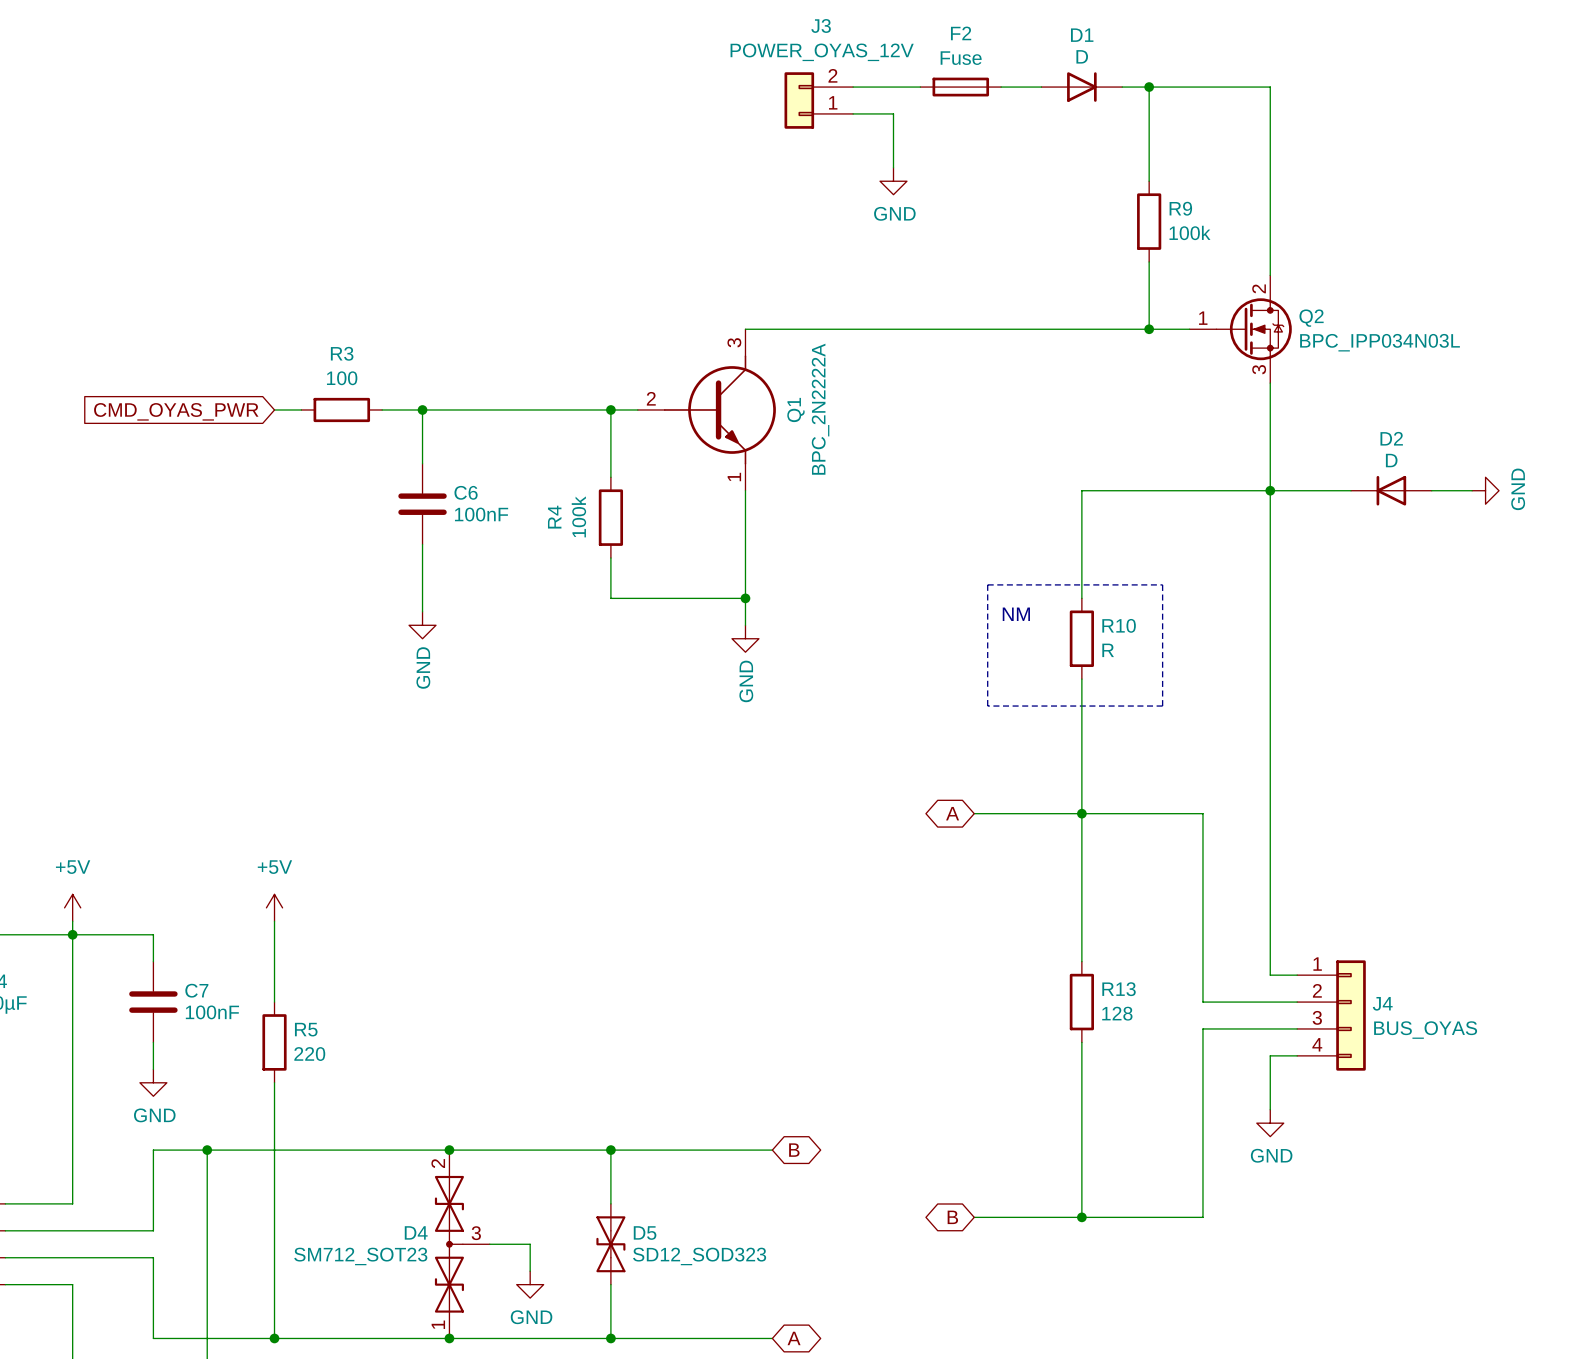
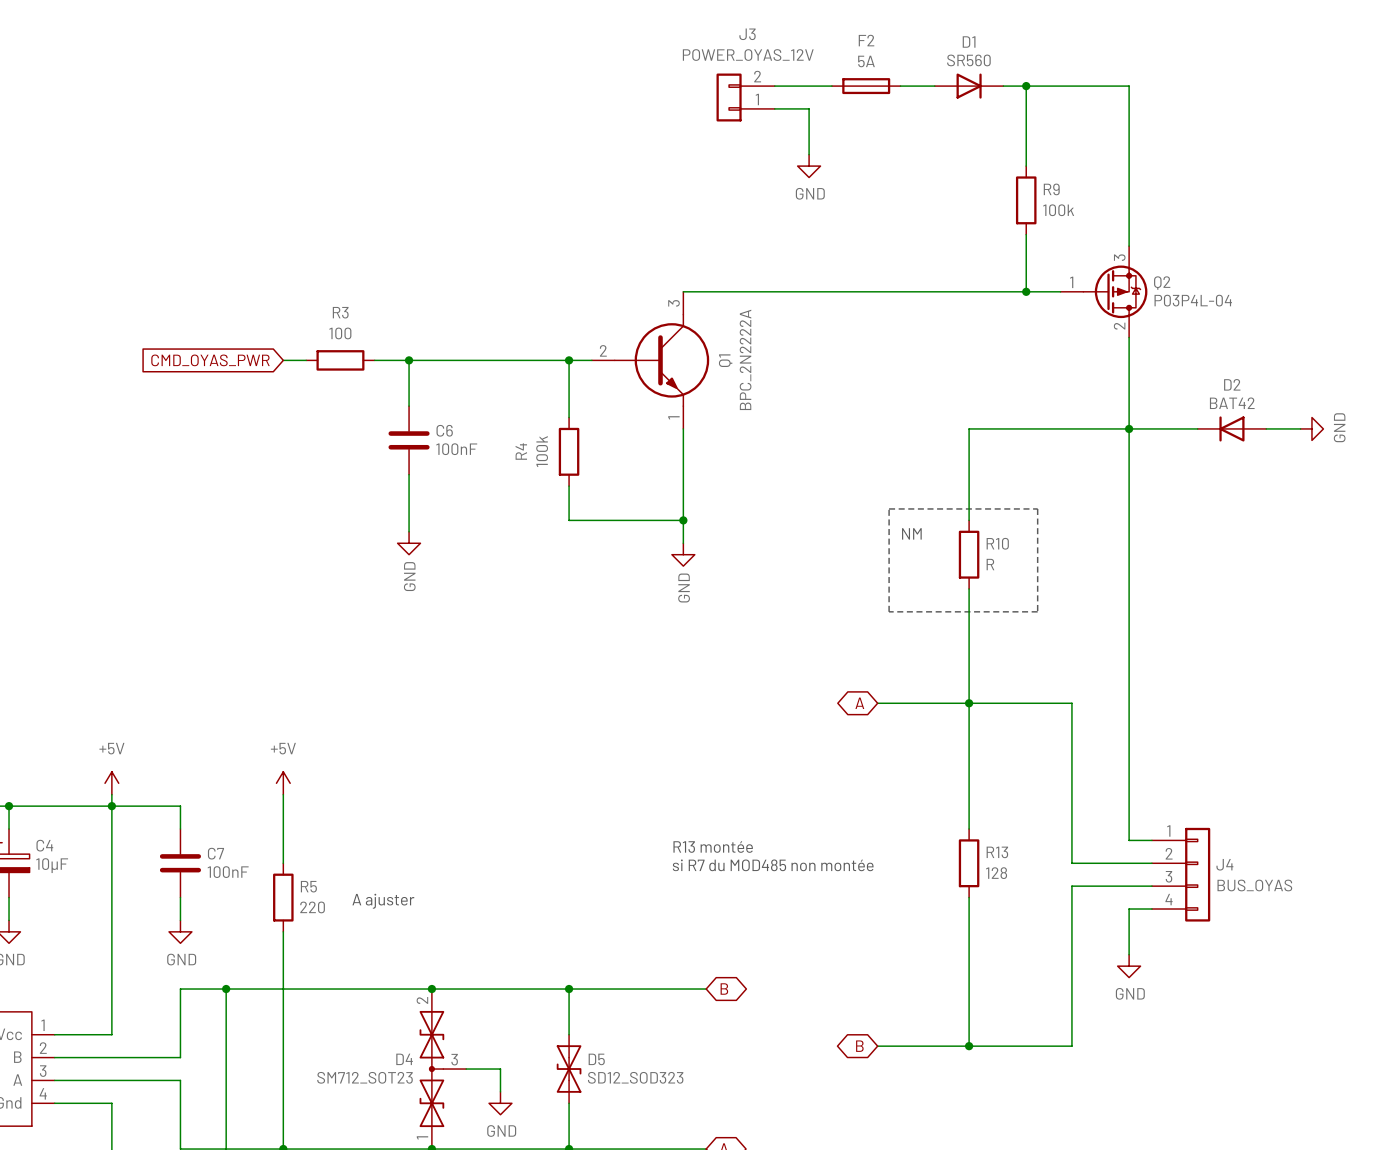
D1 value: D (1082, 56) -> SR560 (968, 60)
F2 value: Fuse (961, 58) -> 5A (866, 61)
Q2 symbol: [1189, 275, 1292, 384] -> [1060, 246, 1148, 338]
Q2 value: BPC_IPP034N03L (1380, 342) -> P03P4L-04 (1193, 300)
D2 value: D (1391, 460) -> BAT42 (1232, 403)
text: none -> R13 montée (713, 847)
text: none -> si R7 du MOD485 non montée (773, 865)
text: none -> A ajuster (383, 901)

